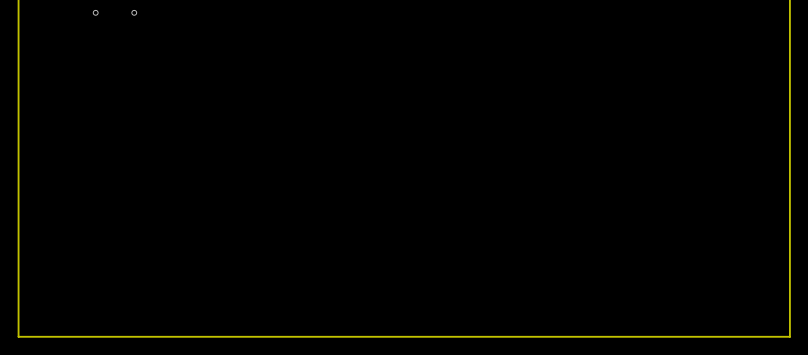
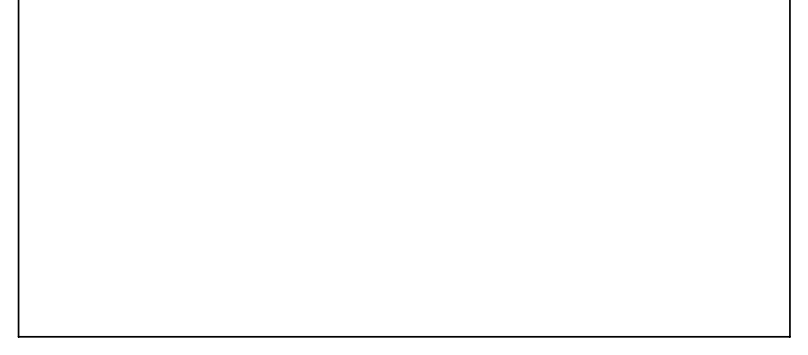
via: (95, 12) -> none
via: (134, 12) -> none

